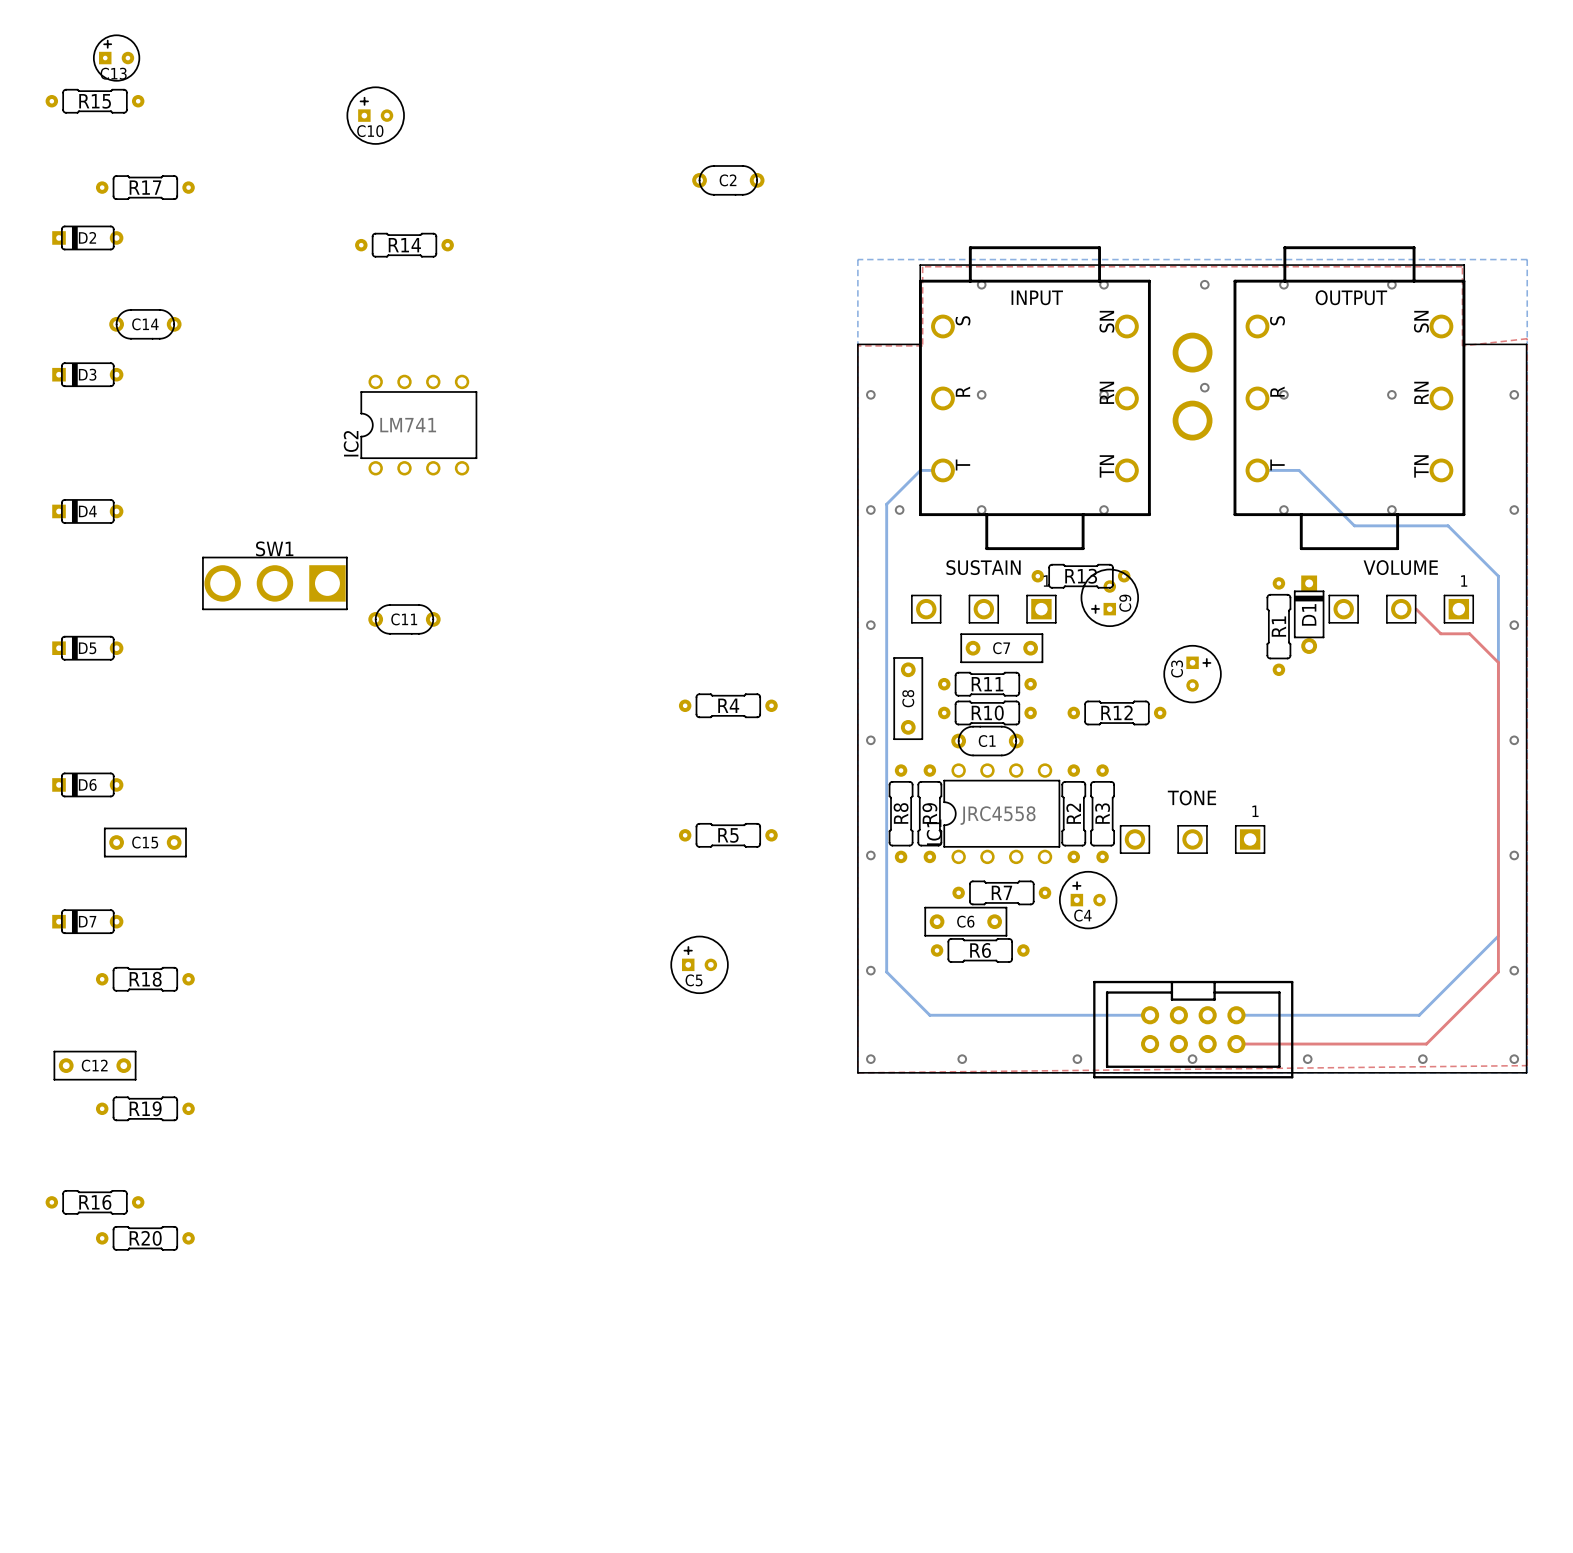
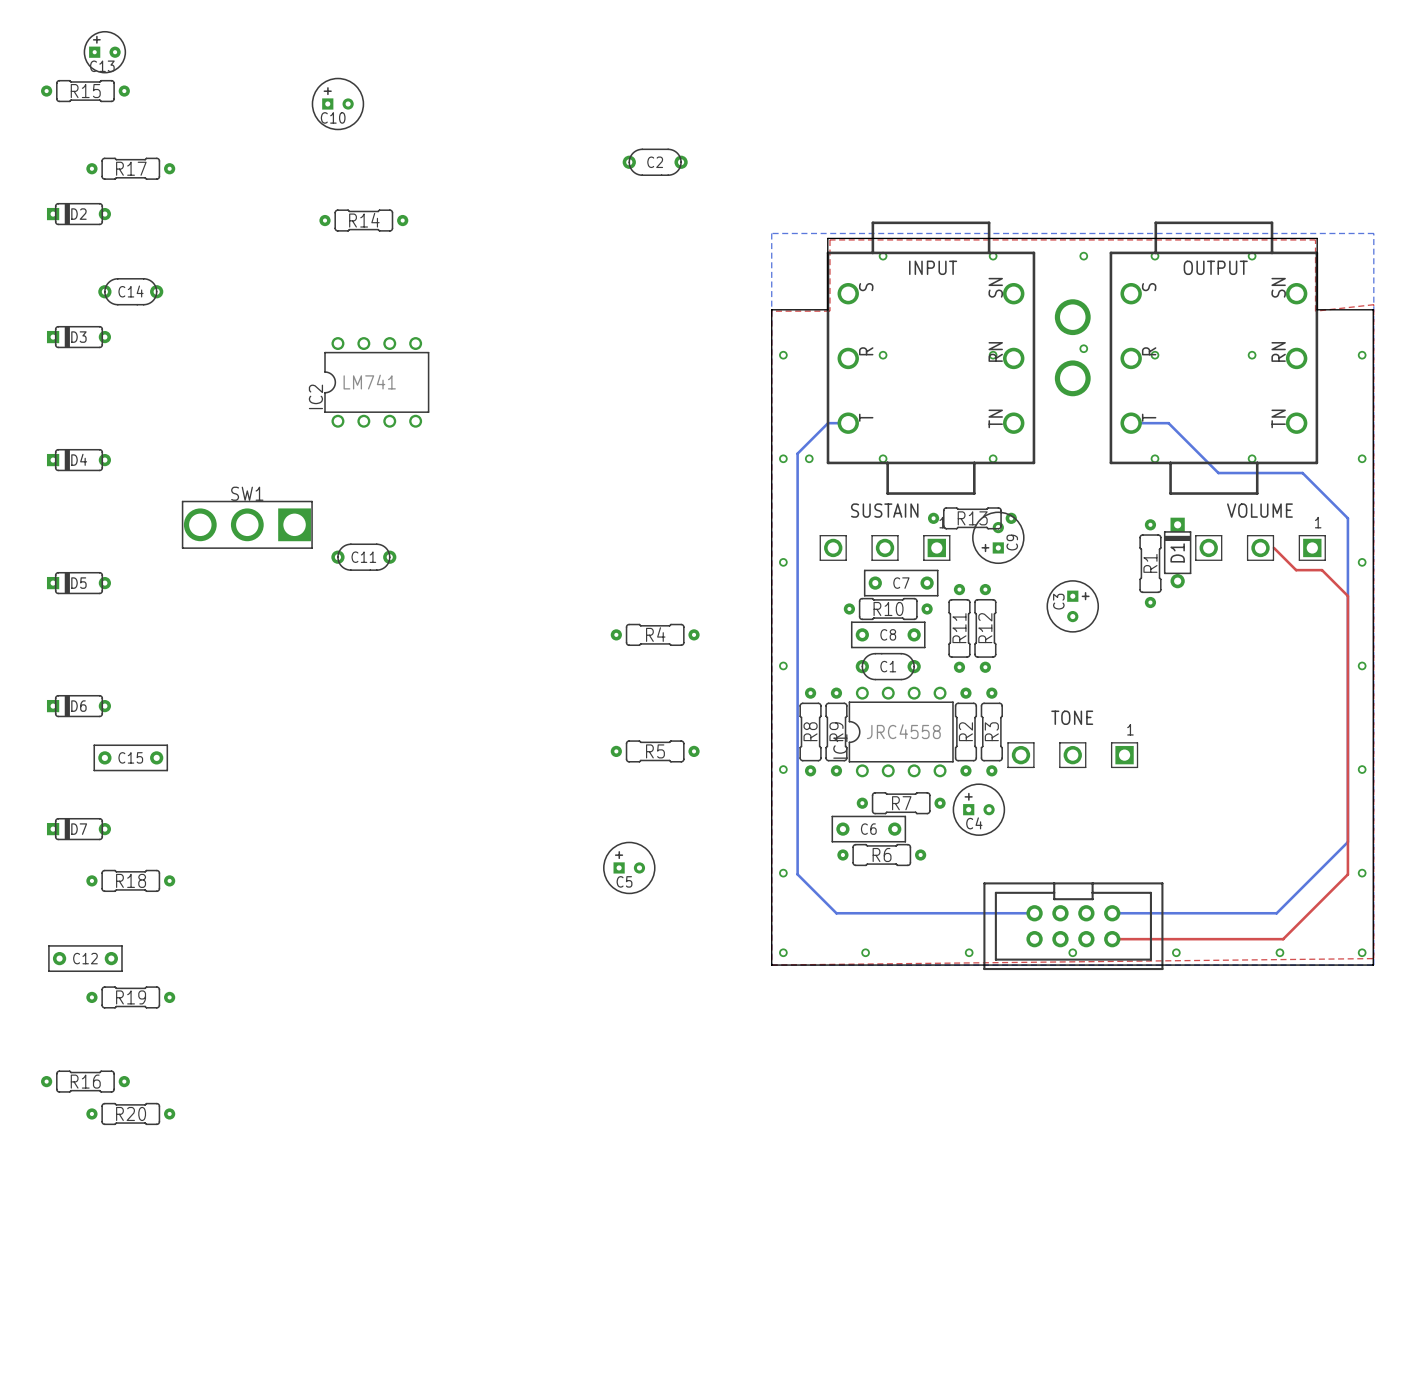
R11 rotation: 0° (987, 684) -> 90° clockwise (959, 628)
R11 position: (987, 684) -> (959, 628)
C8 rotation: 0° (908, 698) -> 90° clockwise (888, 634)
C8 position: (908, 698) -> (888, 634)
R10 position: (987, 712) -> (888, 608)
R12 rotation: 0° (1116, 712) -> 90° clockwise (985, 628)

